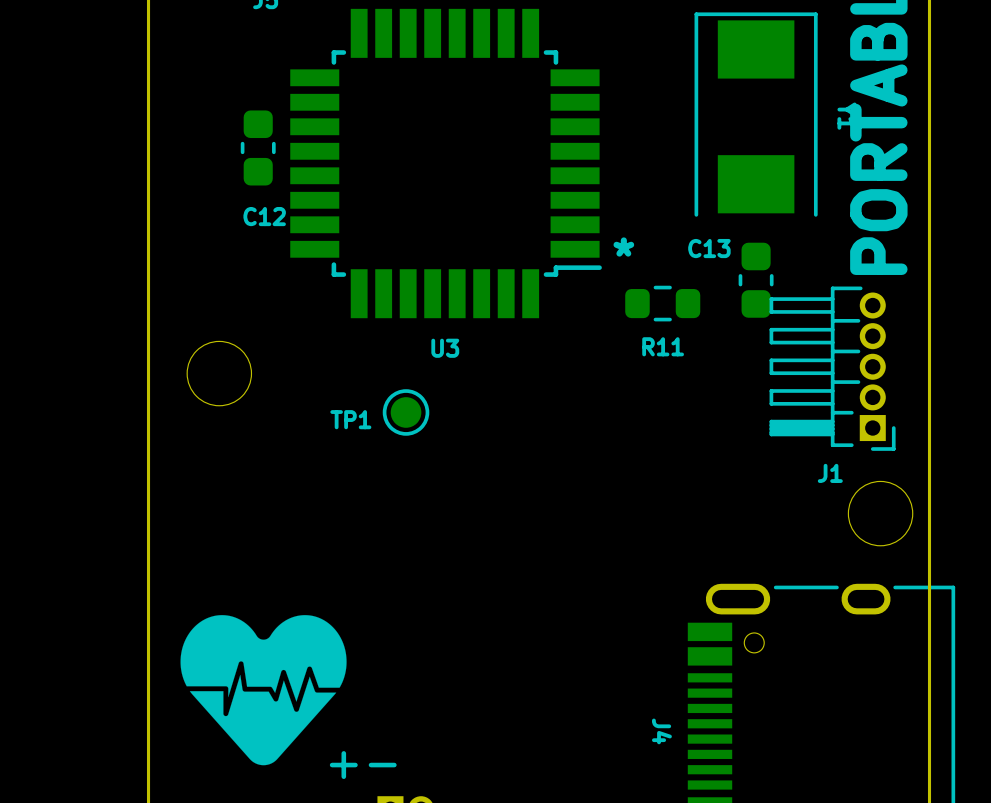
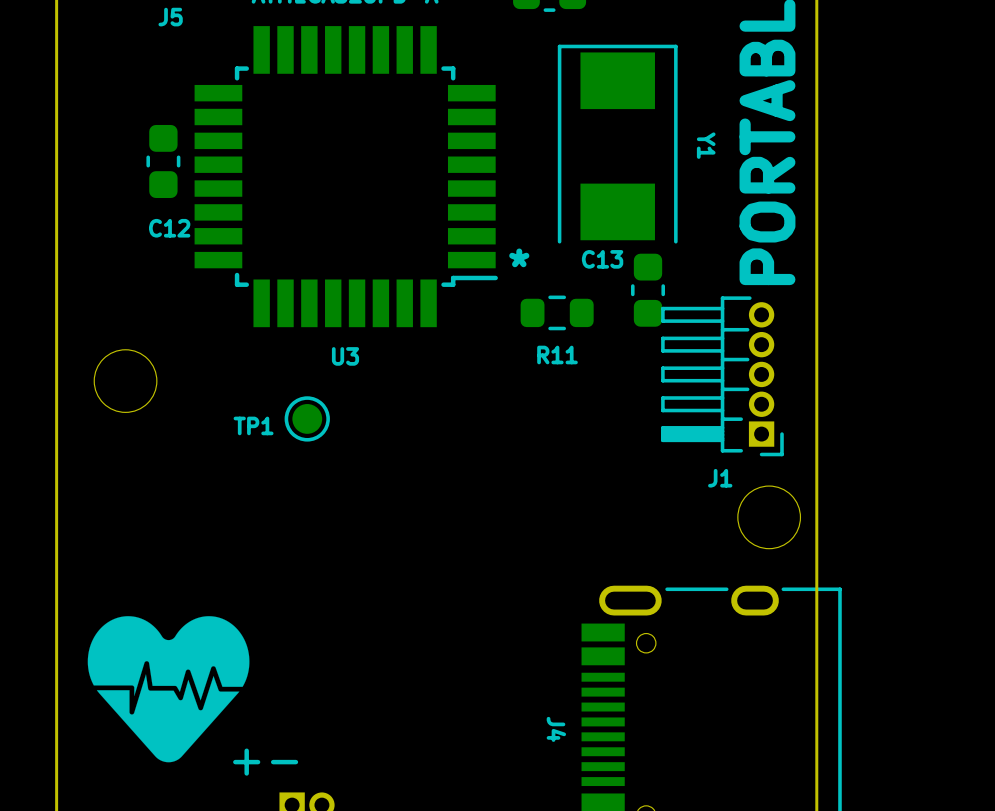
Y1 position: (756, 114) -> (617, 144)

